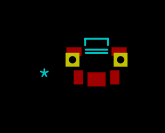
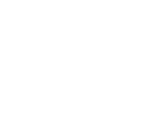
part: (96, 62) -> none

